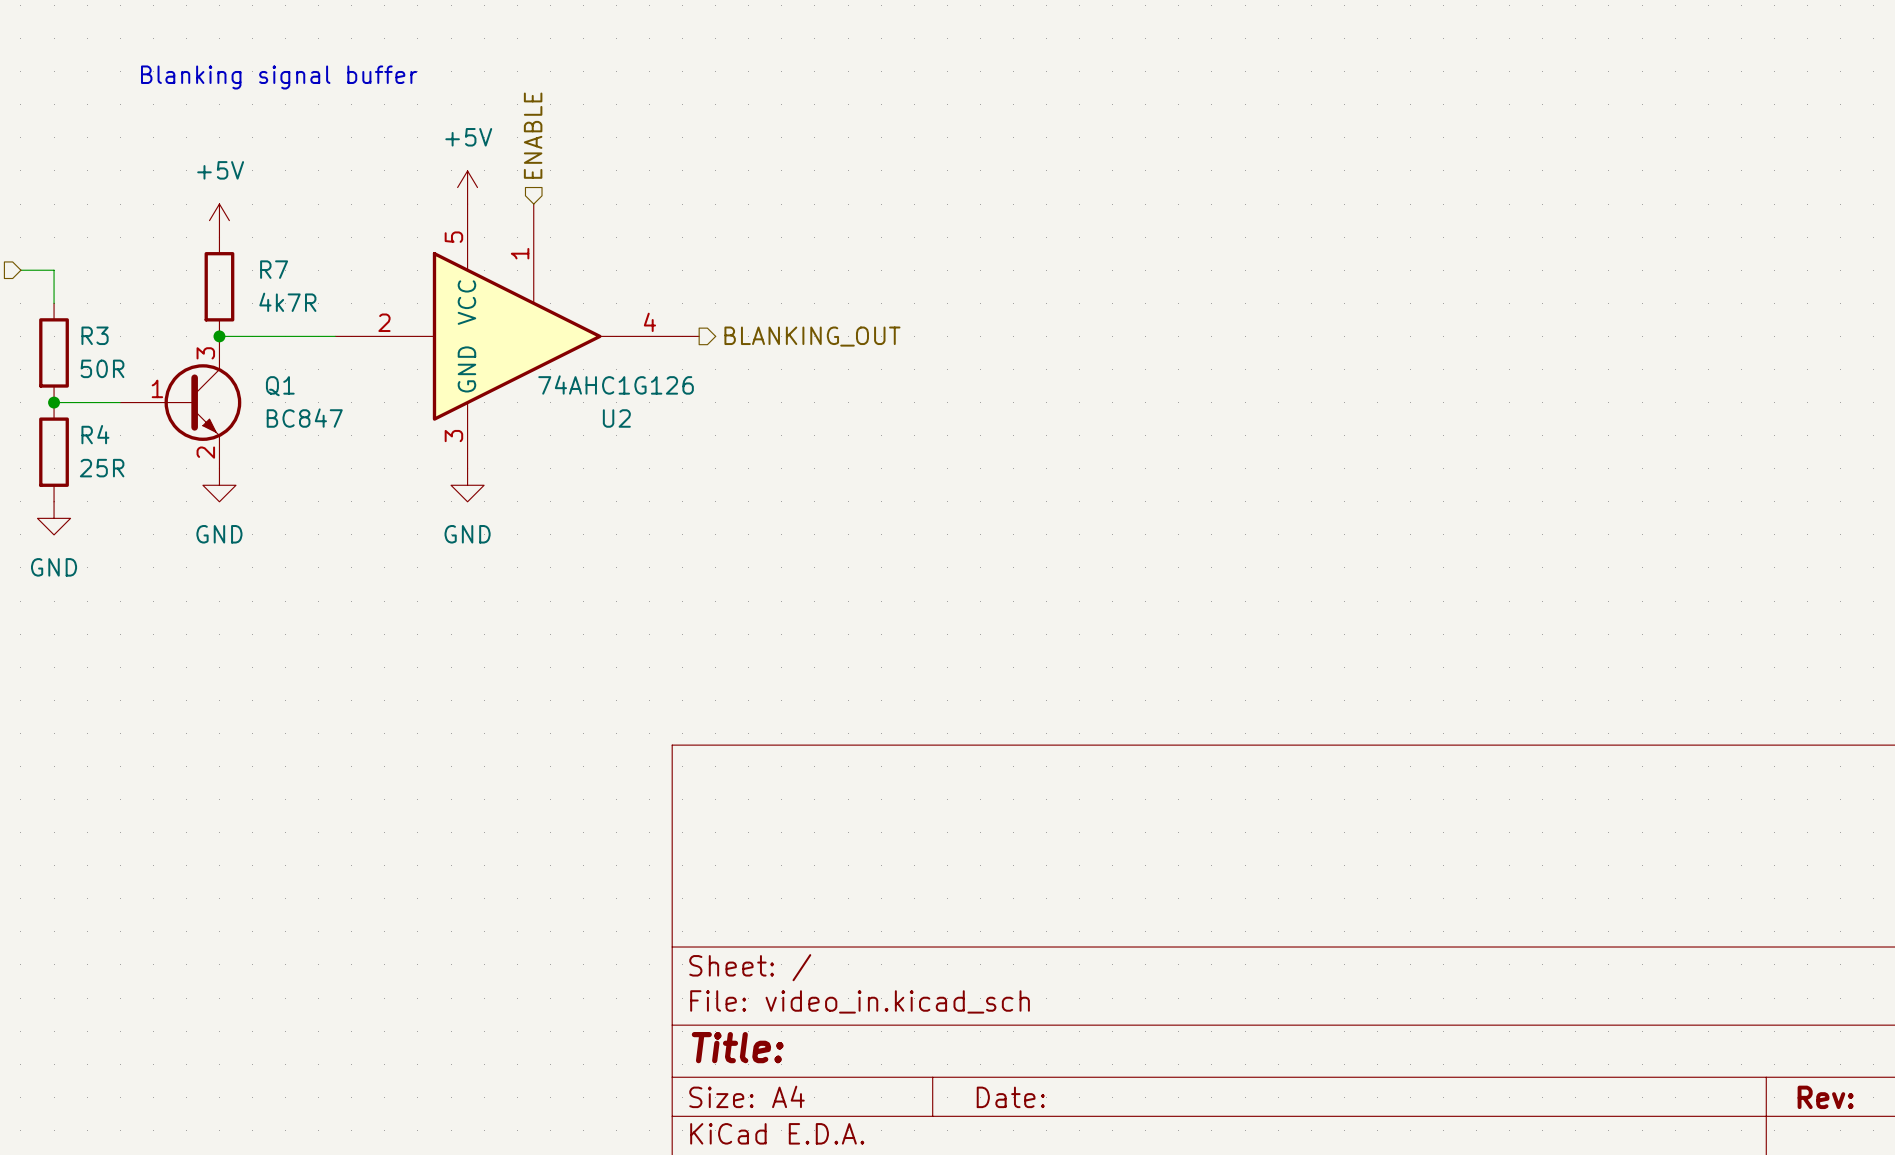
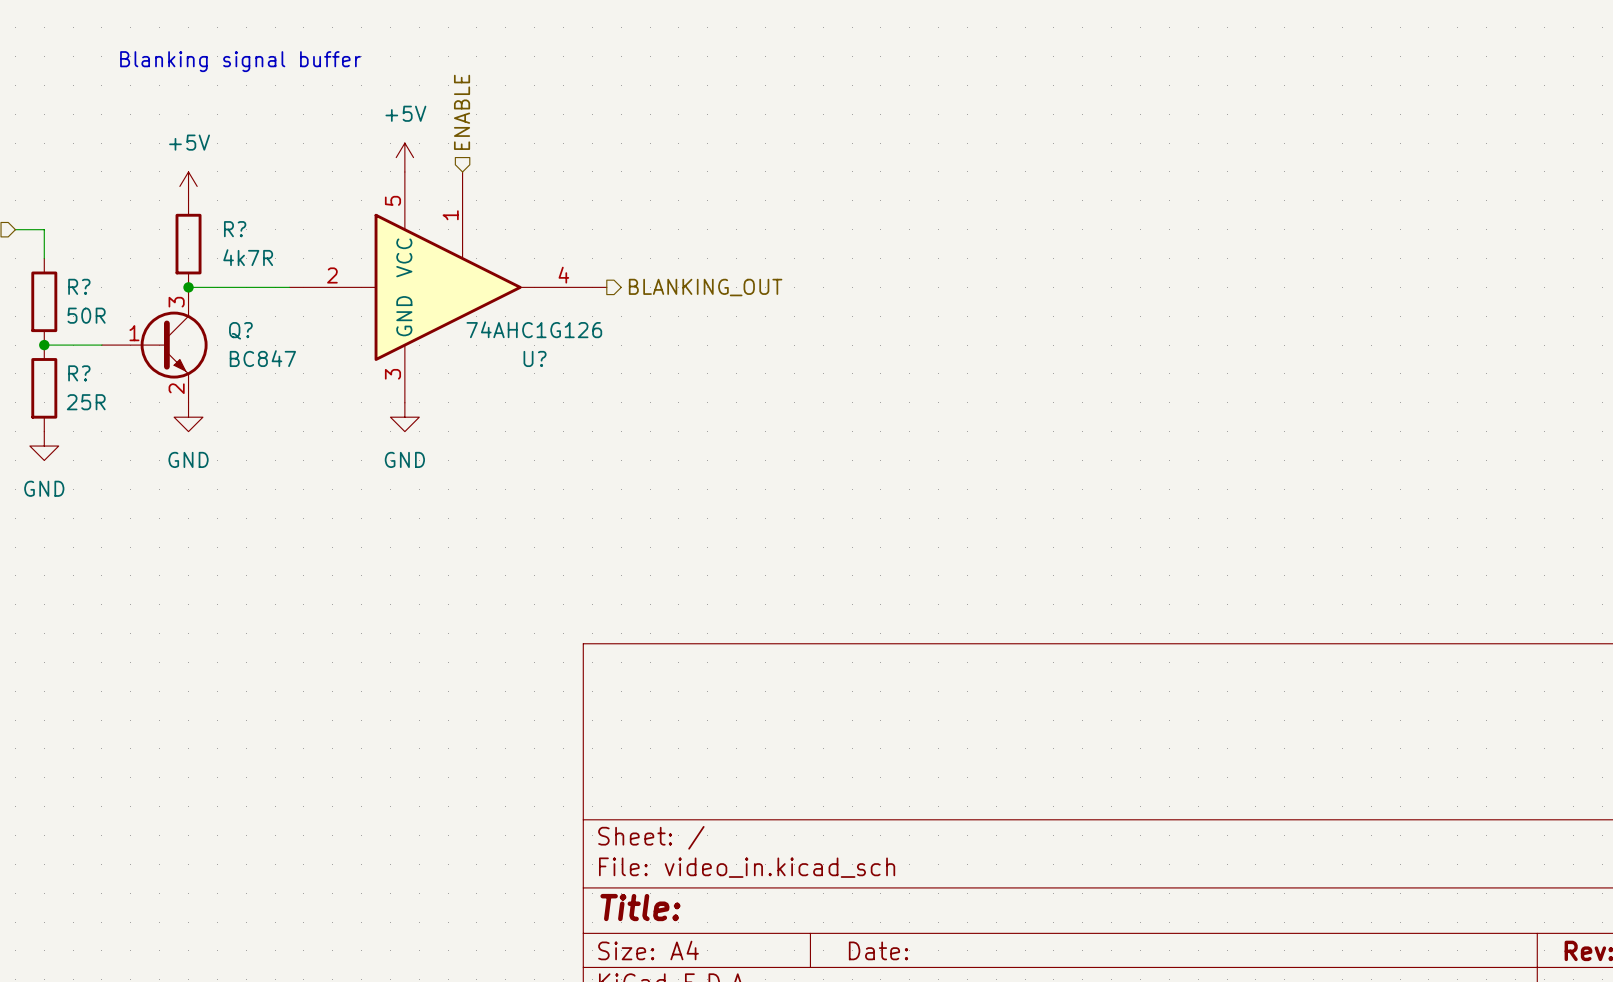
R7 name: R7 (274, 269) -> R? (235, 229)
R3 name: R3 (95, 335) -> R? (79, 286)
Q1 name: Q1 (280, 386) -> Q? (240, 330)
U2 name: U2 (616, 418) -> U? (535, 358)
R4 name: R4 (95, 434) -> R? (79, 373)

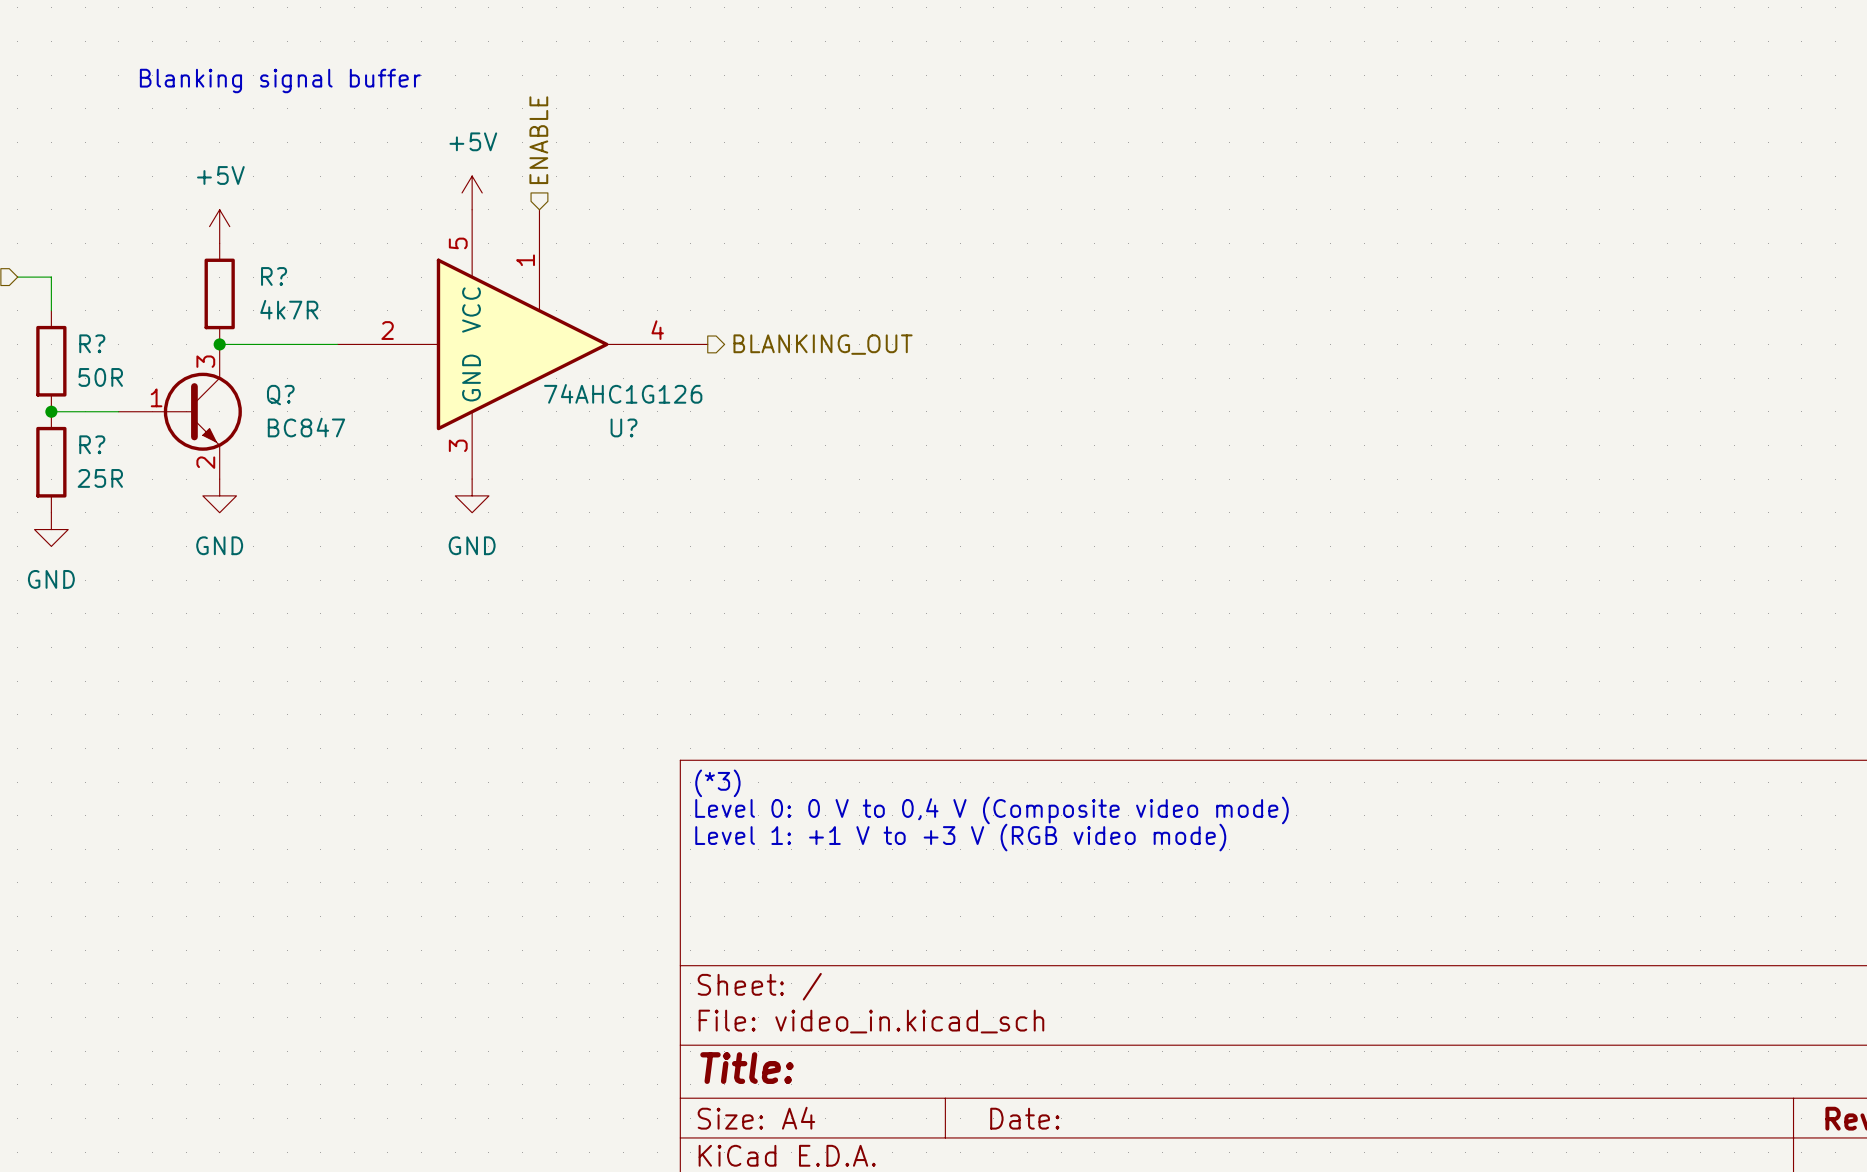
text: none -> (*3) (717, 783)
text: none -> Level 0: 0 V to 0,4 V (Composite video mode) (992, 810)
text: none -> Level 1: +1 V to +3 V (RGB video mode) (960, 837)

